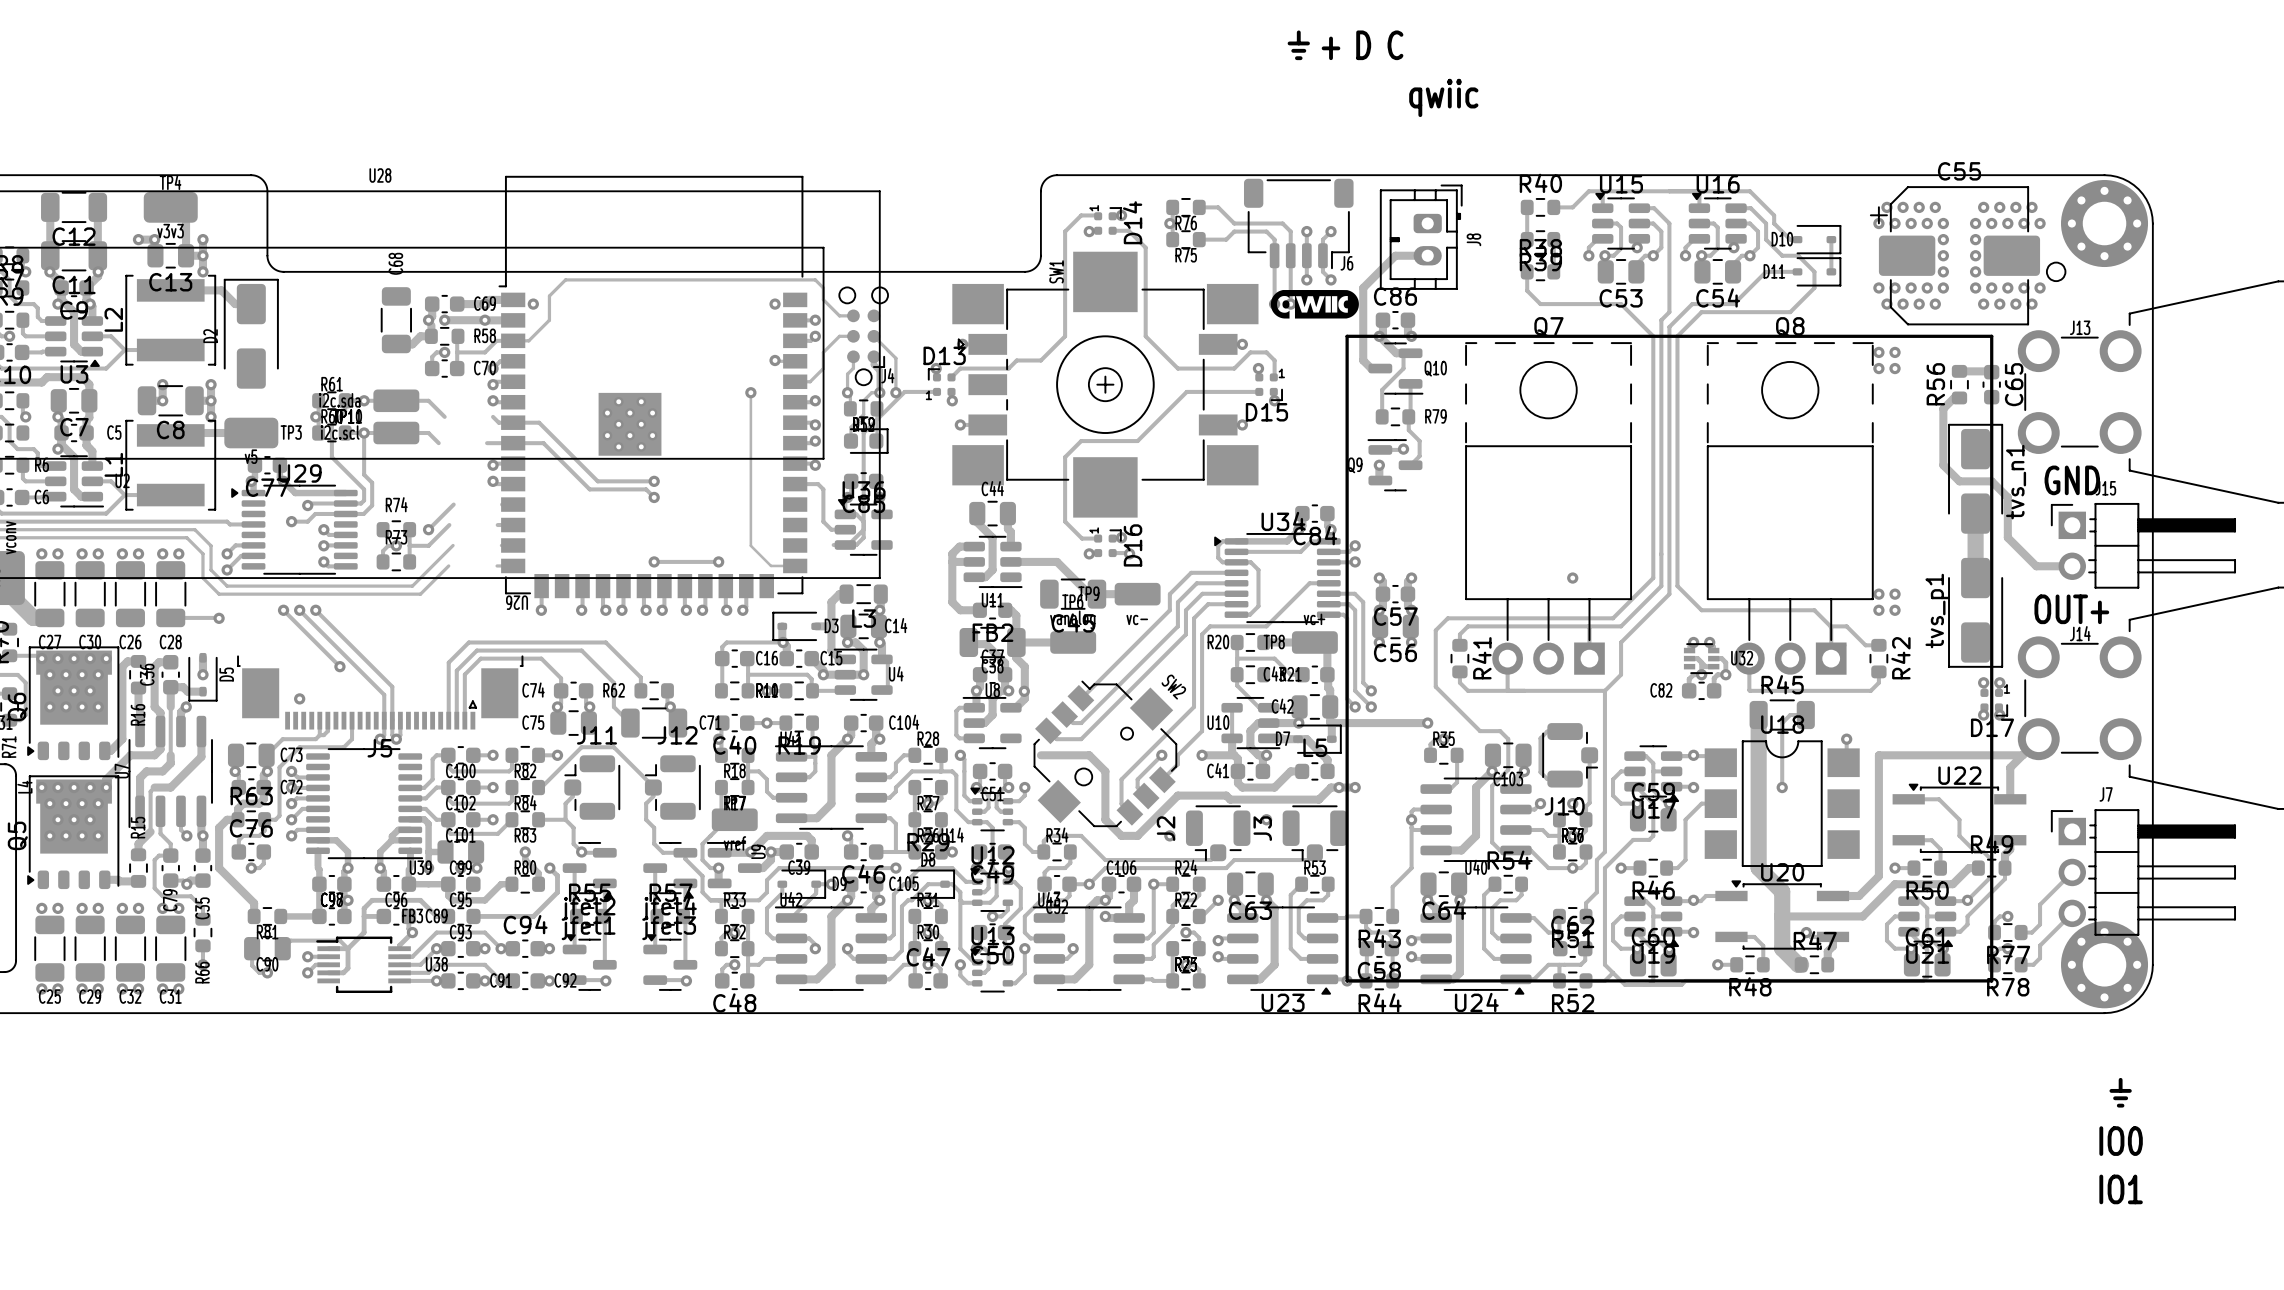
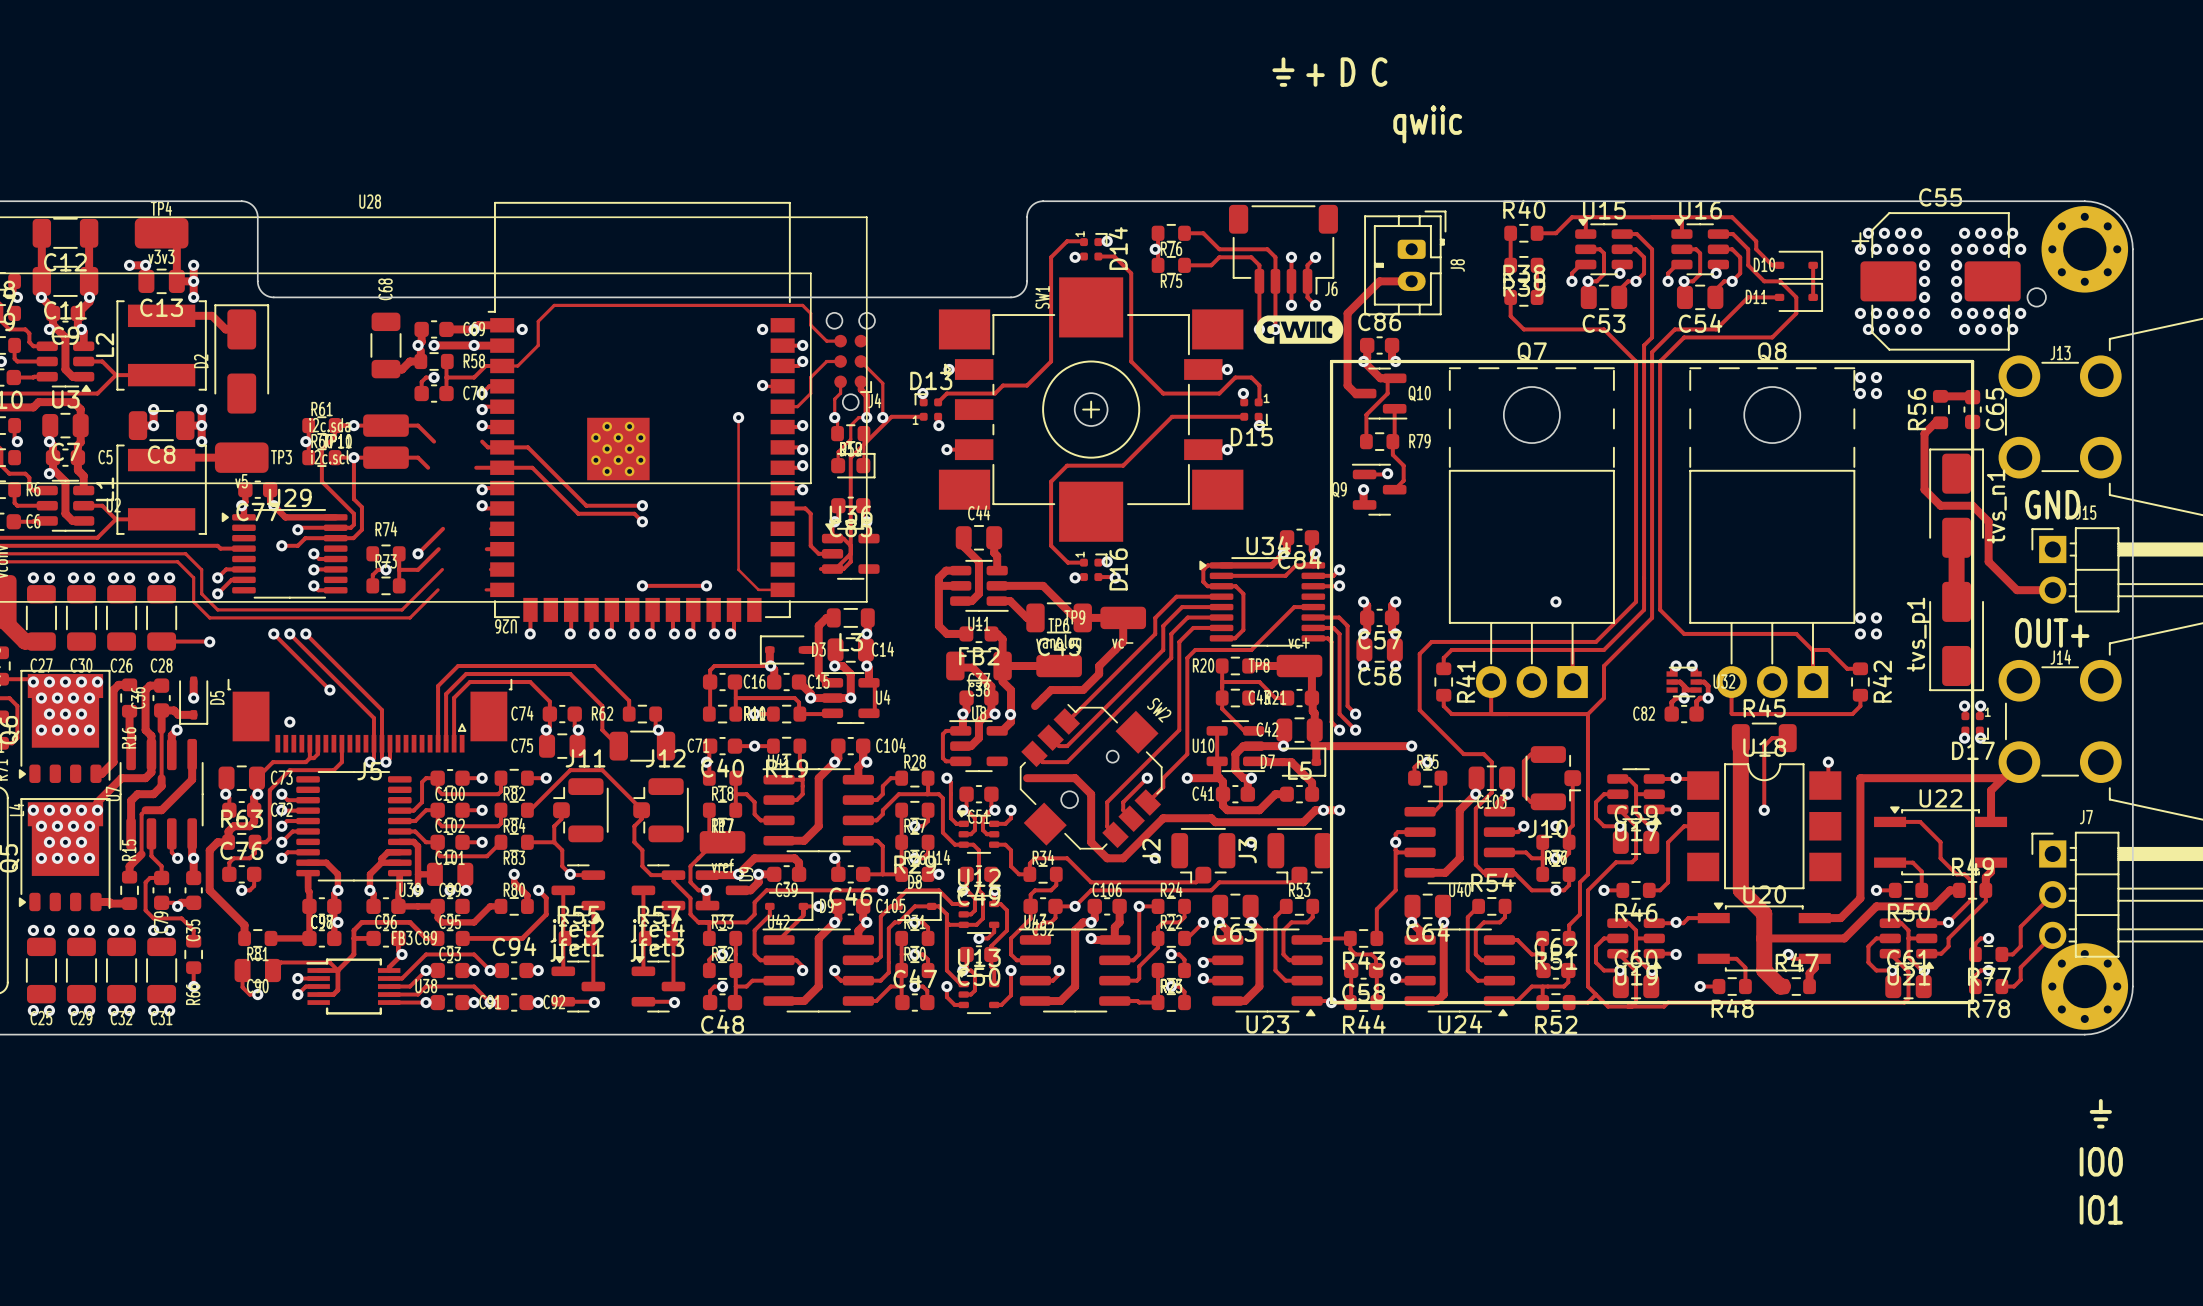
track: none -> (997, 601) (1010, 601) (1027, 617) (1035, 617)
track: none -> (1123, 617) (1123, 641) (1099, 665) (1099, 674) (1083, 690) (1051, 690) (1035, 706)

